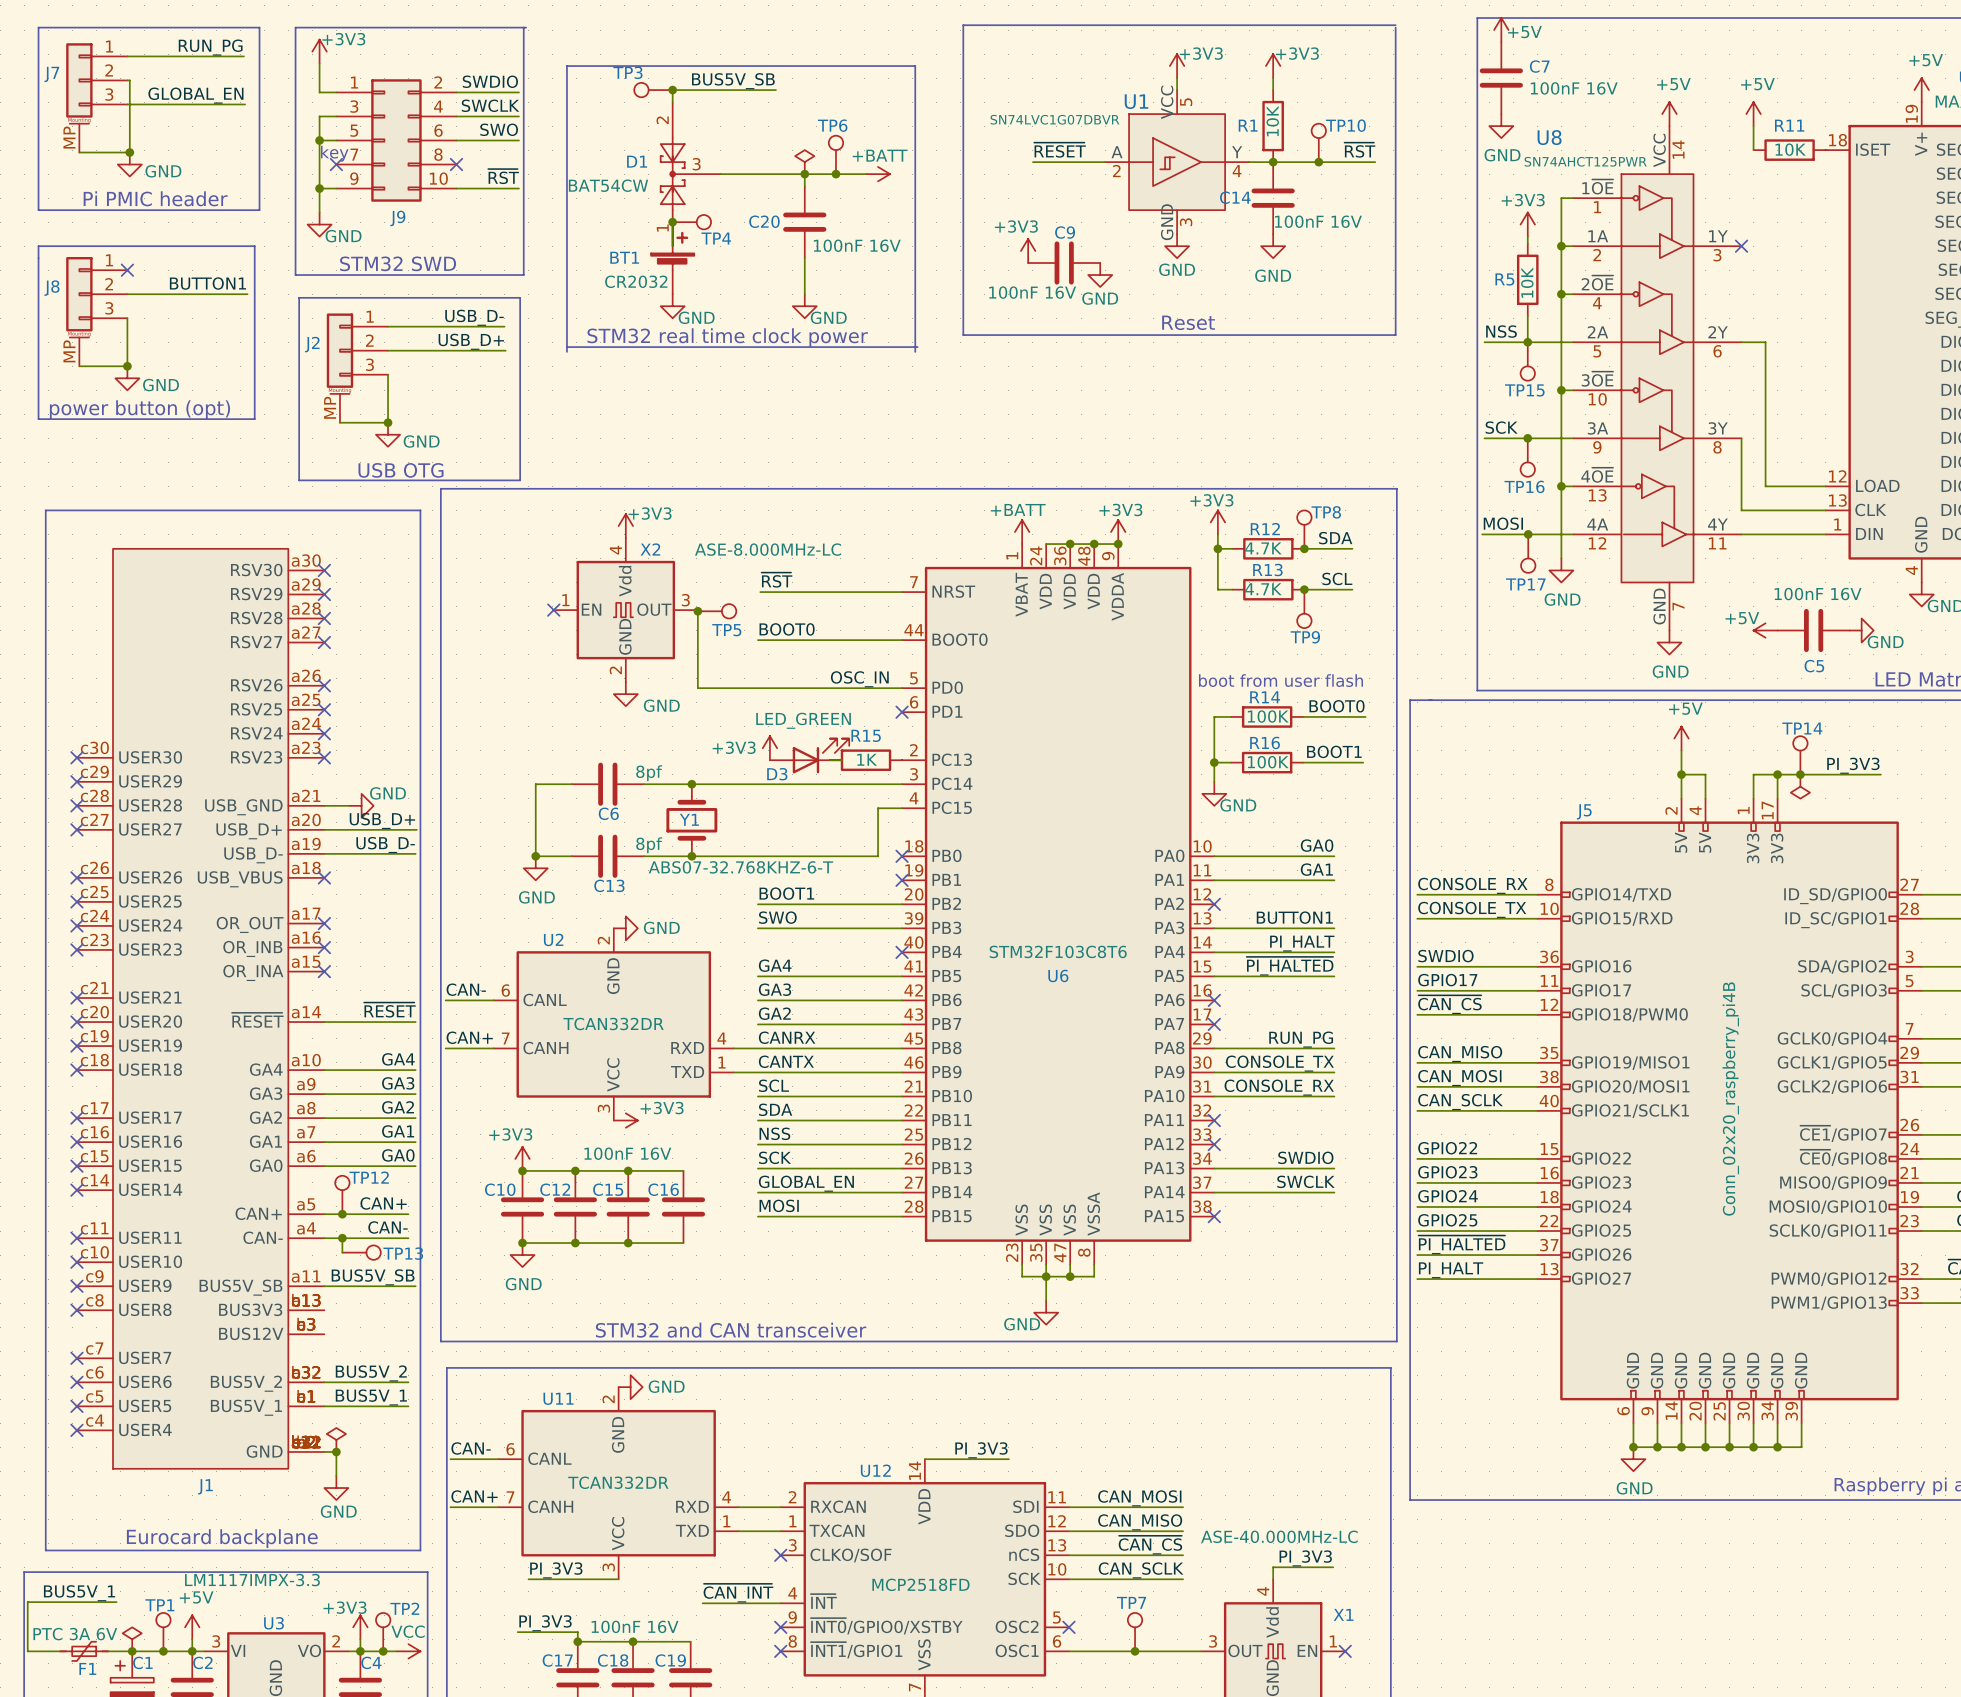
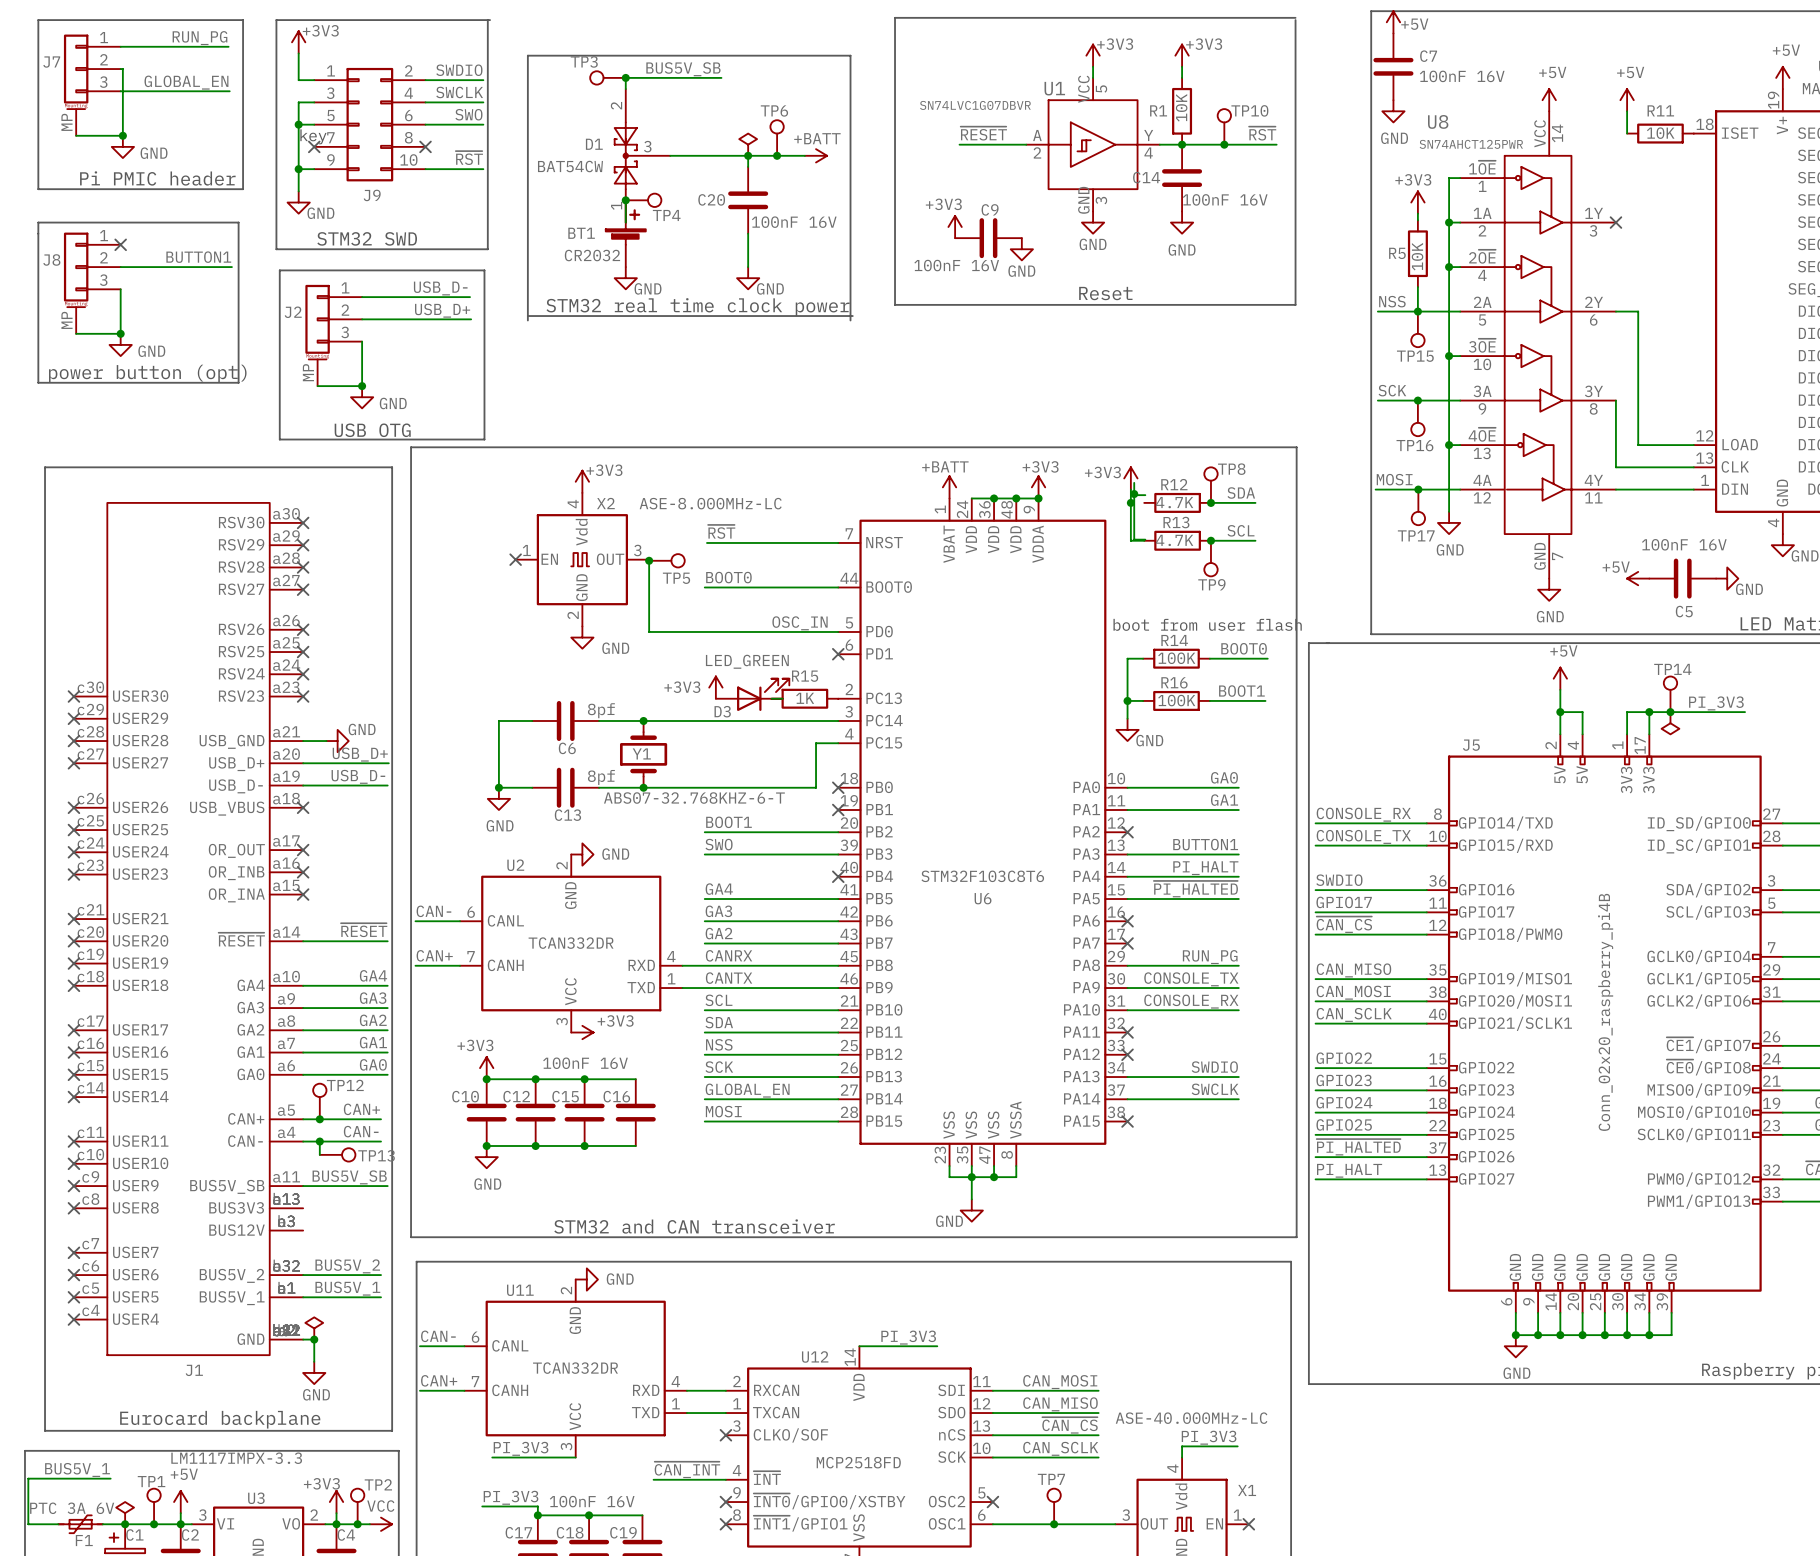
power symbol text position: +3V3 (1211, 500) -> +3V3 (1102, 472)
wire: none -> (1134, 482) (1134, 494)
junction: none -> (1134, 494)
wire: none -> (1145, 495) (1134, 495) (1134, 539) (1145, 539)
wire: (1217, 548) (1232, 548) -> none

